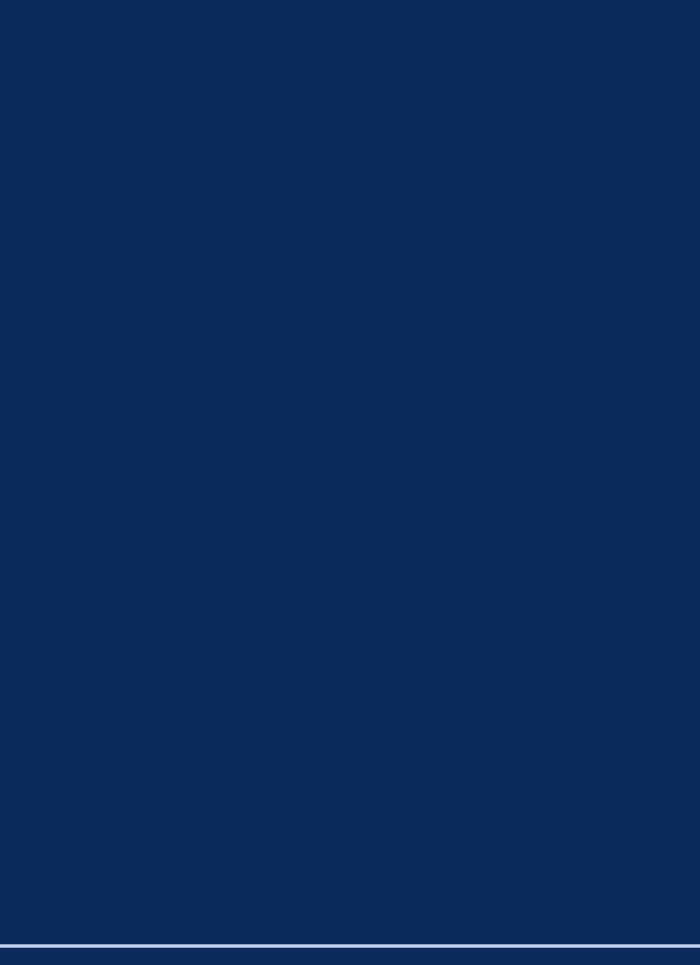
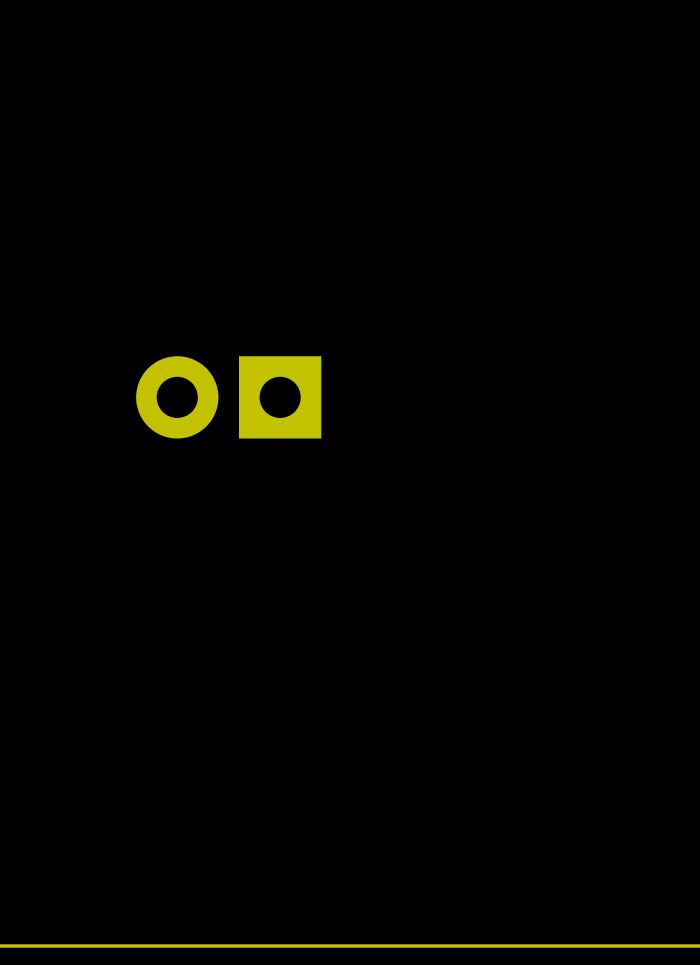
part: none -> (228, 397)

